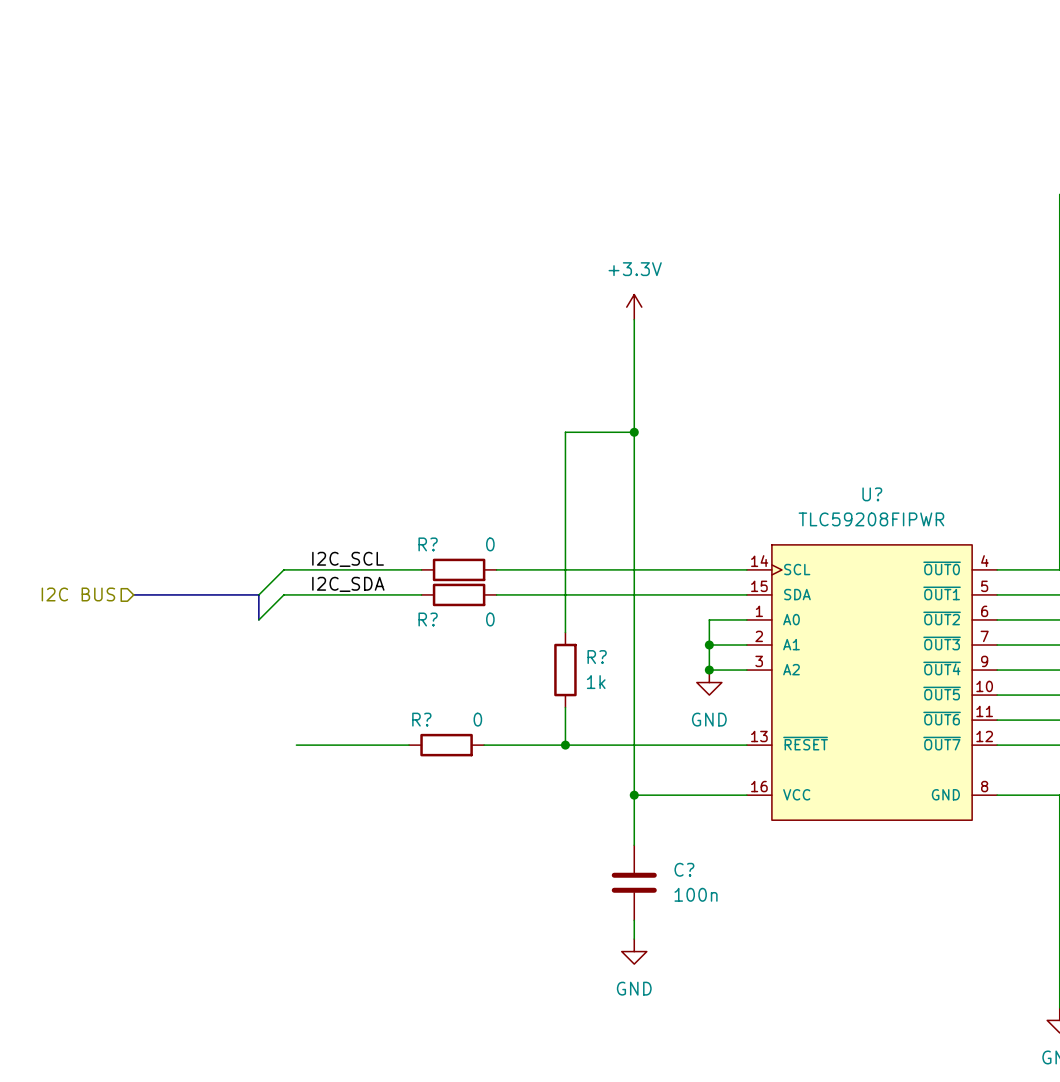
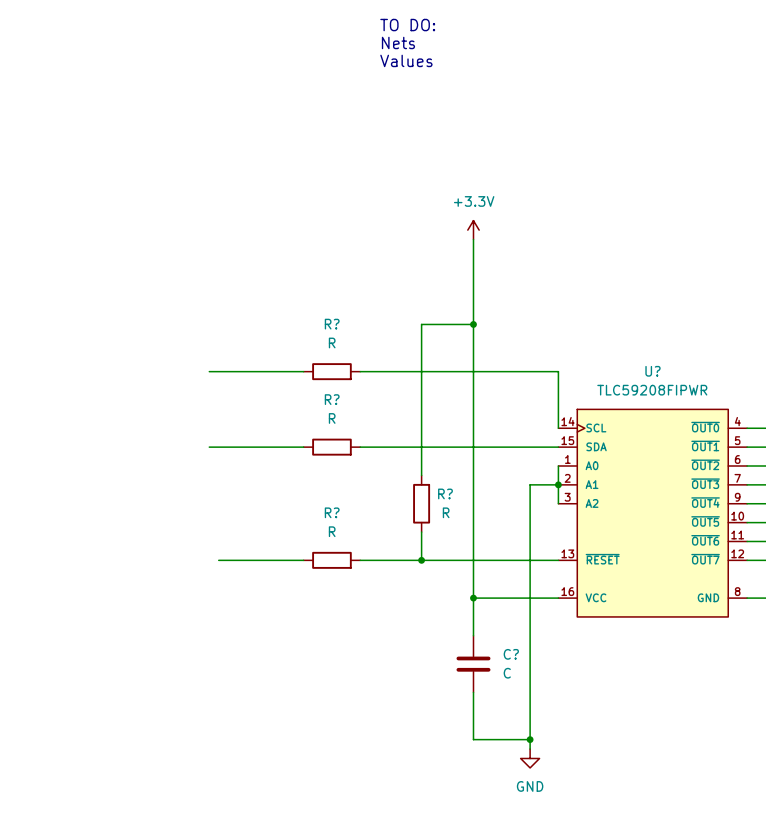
text: none -> TO DO: (407, 25)
text: none -> Nets (398, 42)
text: none -> Values (406, 60)
wire: none -> (209, 371) (303, 371)
R?: none -> R (331, 371)
label: I2C_SCL (348, 559) -> none
wire: (421, 569) (283, 569) (258, 594) -> none
R?: 0 (459, 569) -> none
wire: (496, 569) (746, 569) -> (360, 371) (558, 371) (558, 428)
label: I2C_SDA (348, 584) -> none
hierarchical label: I2C BUS (78, 594) -> none
bus: (133, 594) (258, 594) (258, 619) -> none
wire: (283, 594) (258, 619) -> none
R?: none -> R (331, 447)
R?: 0 (459, 594) -> none
wire: (746, 619) (709, 619) (709, 645) -> (558, 466) (558, 503)
junction: (709, 645) -> none
junction: none -> (558, 484)
wire: (709, 670) (746, 670) -> (530, 503) (530, 749)
junction: (709, 670) -> none
R? value: 1k (596, 682) -> R (446, 512)
power symbol: GND (709, 682) -> none
R? name position: R? (421, 719) -> R? (332, 512)
R? value: 0 (477, 719) -> R (332, 531)
C? value: 100n (696, 894) -> C (507, 673)
wire: none -> (473, 706) (473, 739) (530, 739)
power symbol position: GND (634, 951) -> GND (530, 758)
junction: none -> (530, 739)

